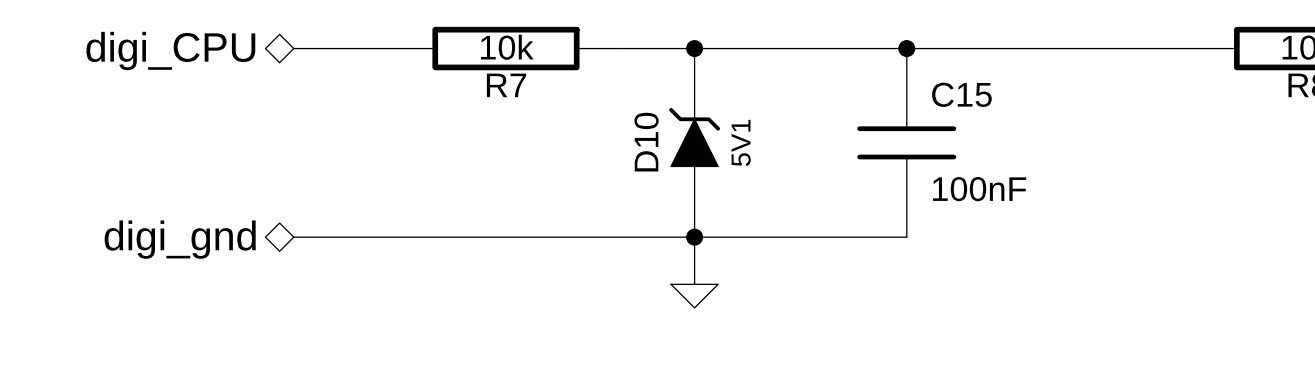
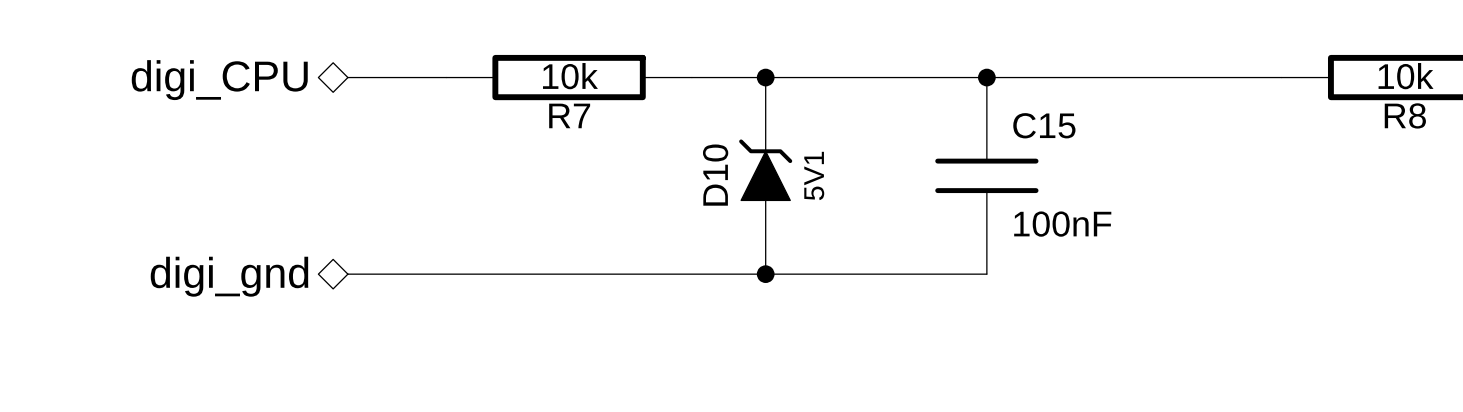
wire: (694, 237) (694, 284) -> none
power symbol: (694, 296) -> none

